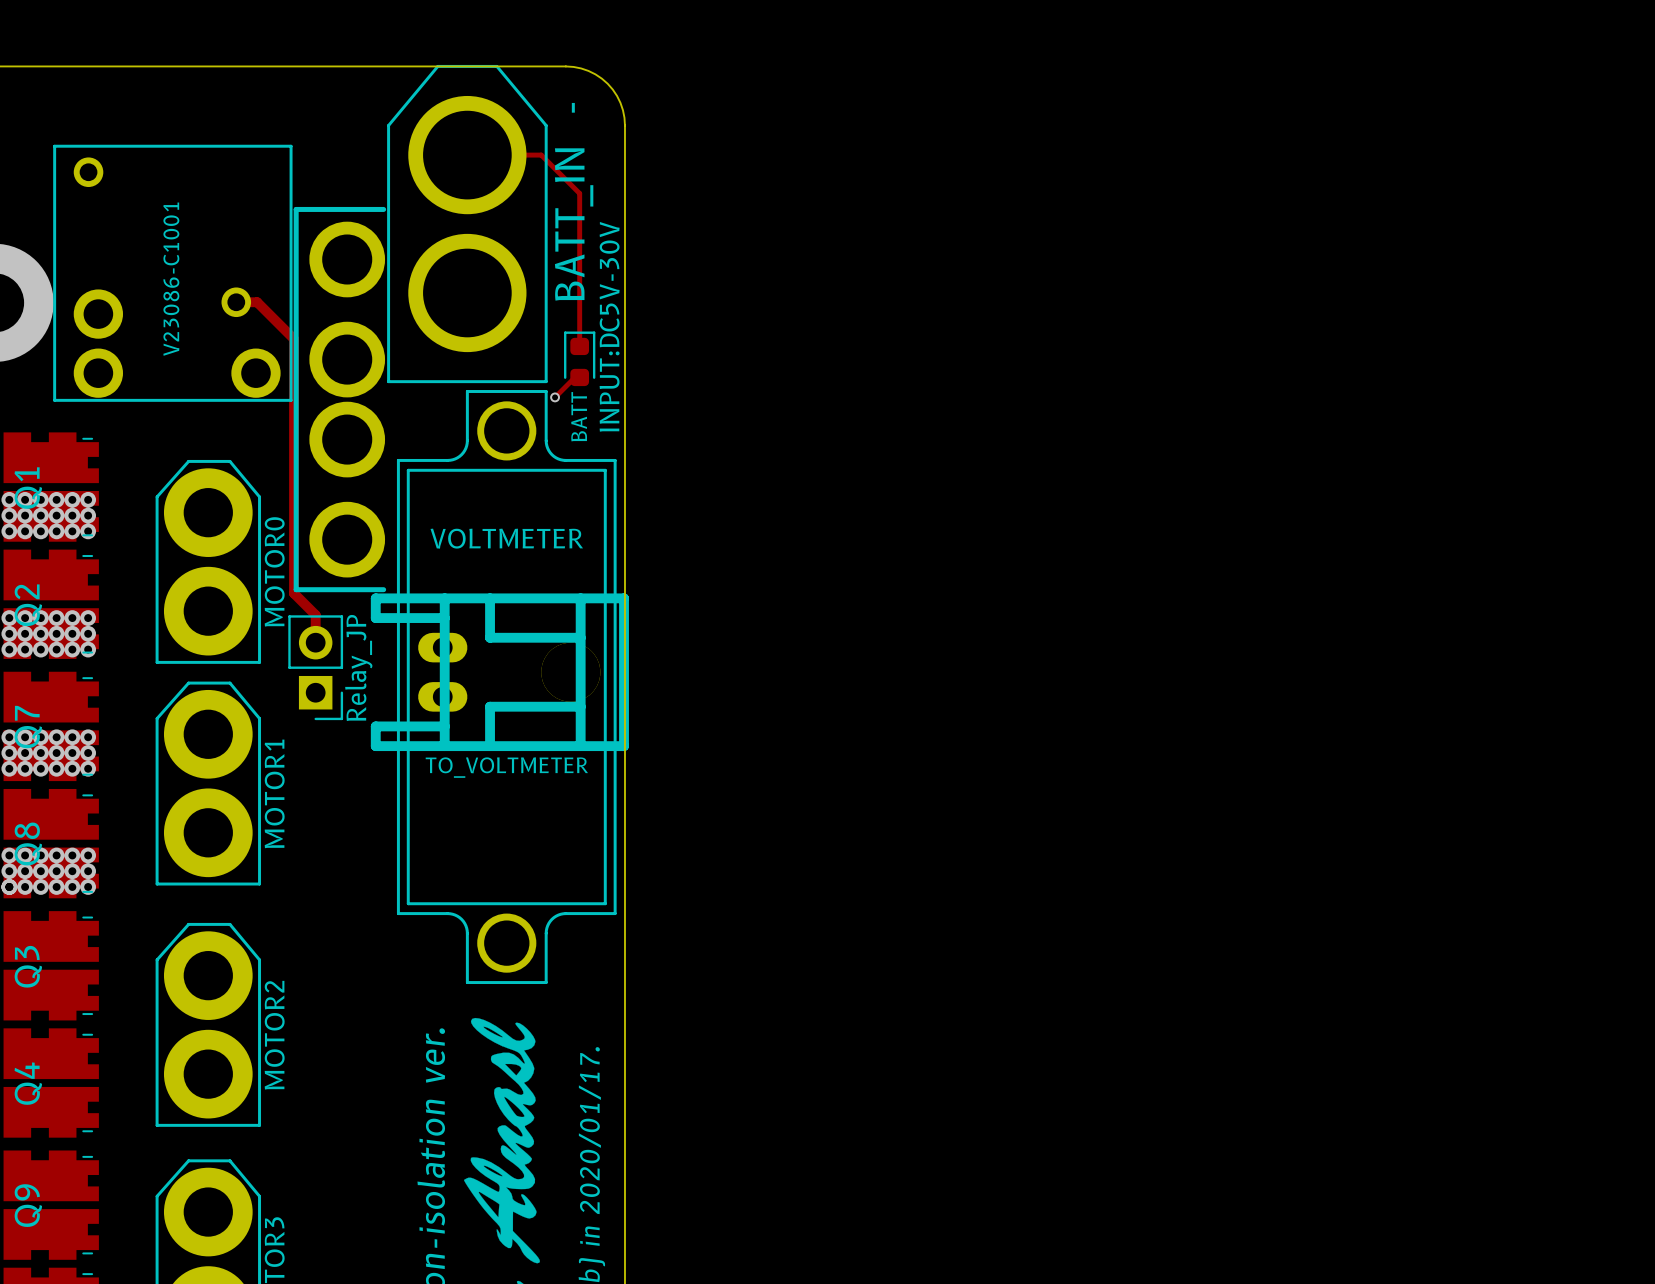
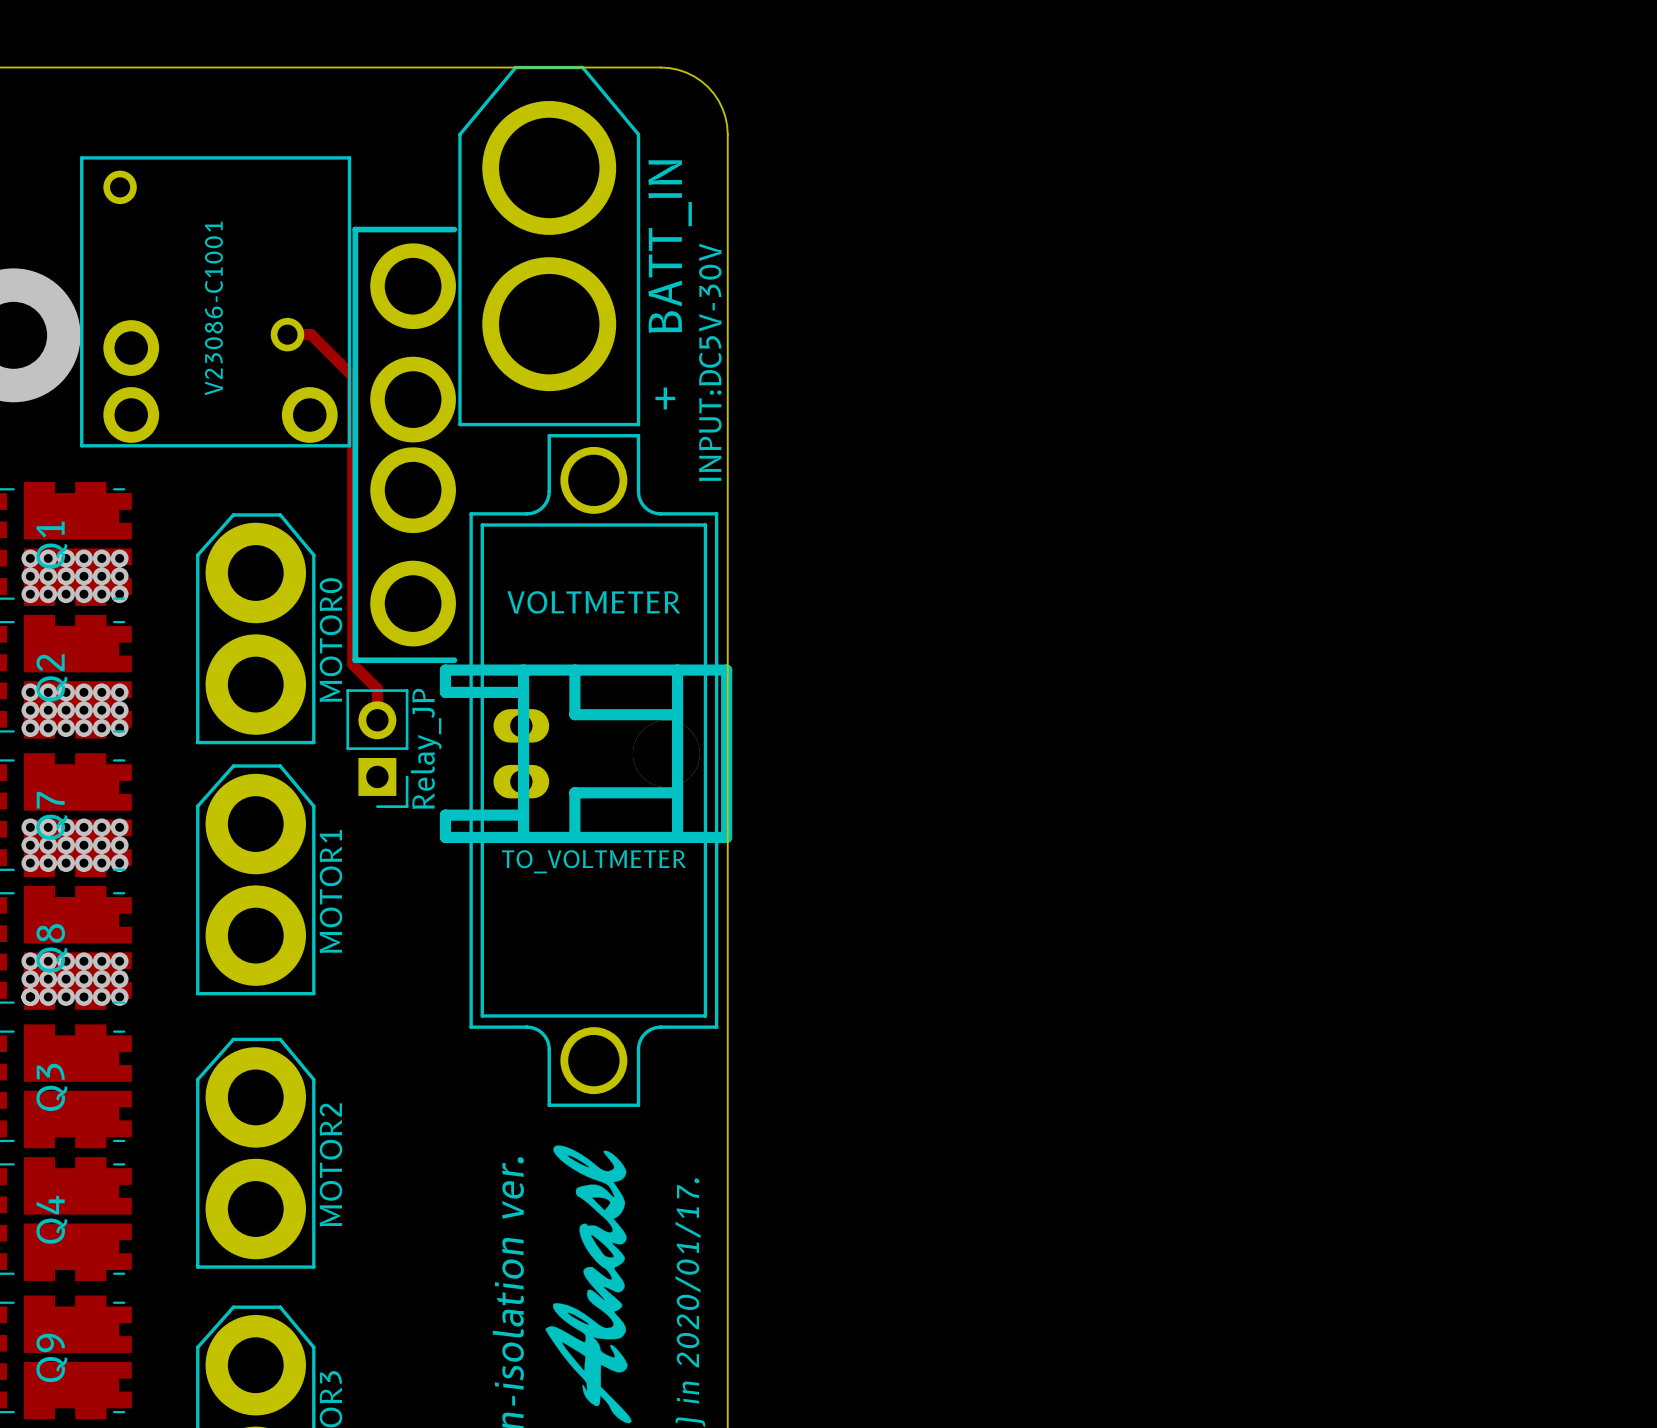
text: - (573, 107) -> none
track: (467, 155) (541, 155) (579, 193) (579, 346) -> none
text: none -> + (665, 398)
part: BATT (579, 358) -> none
track: (579, 377) (575, 377) (555, 397) -> none
via: (555, 397) -> none

